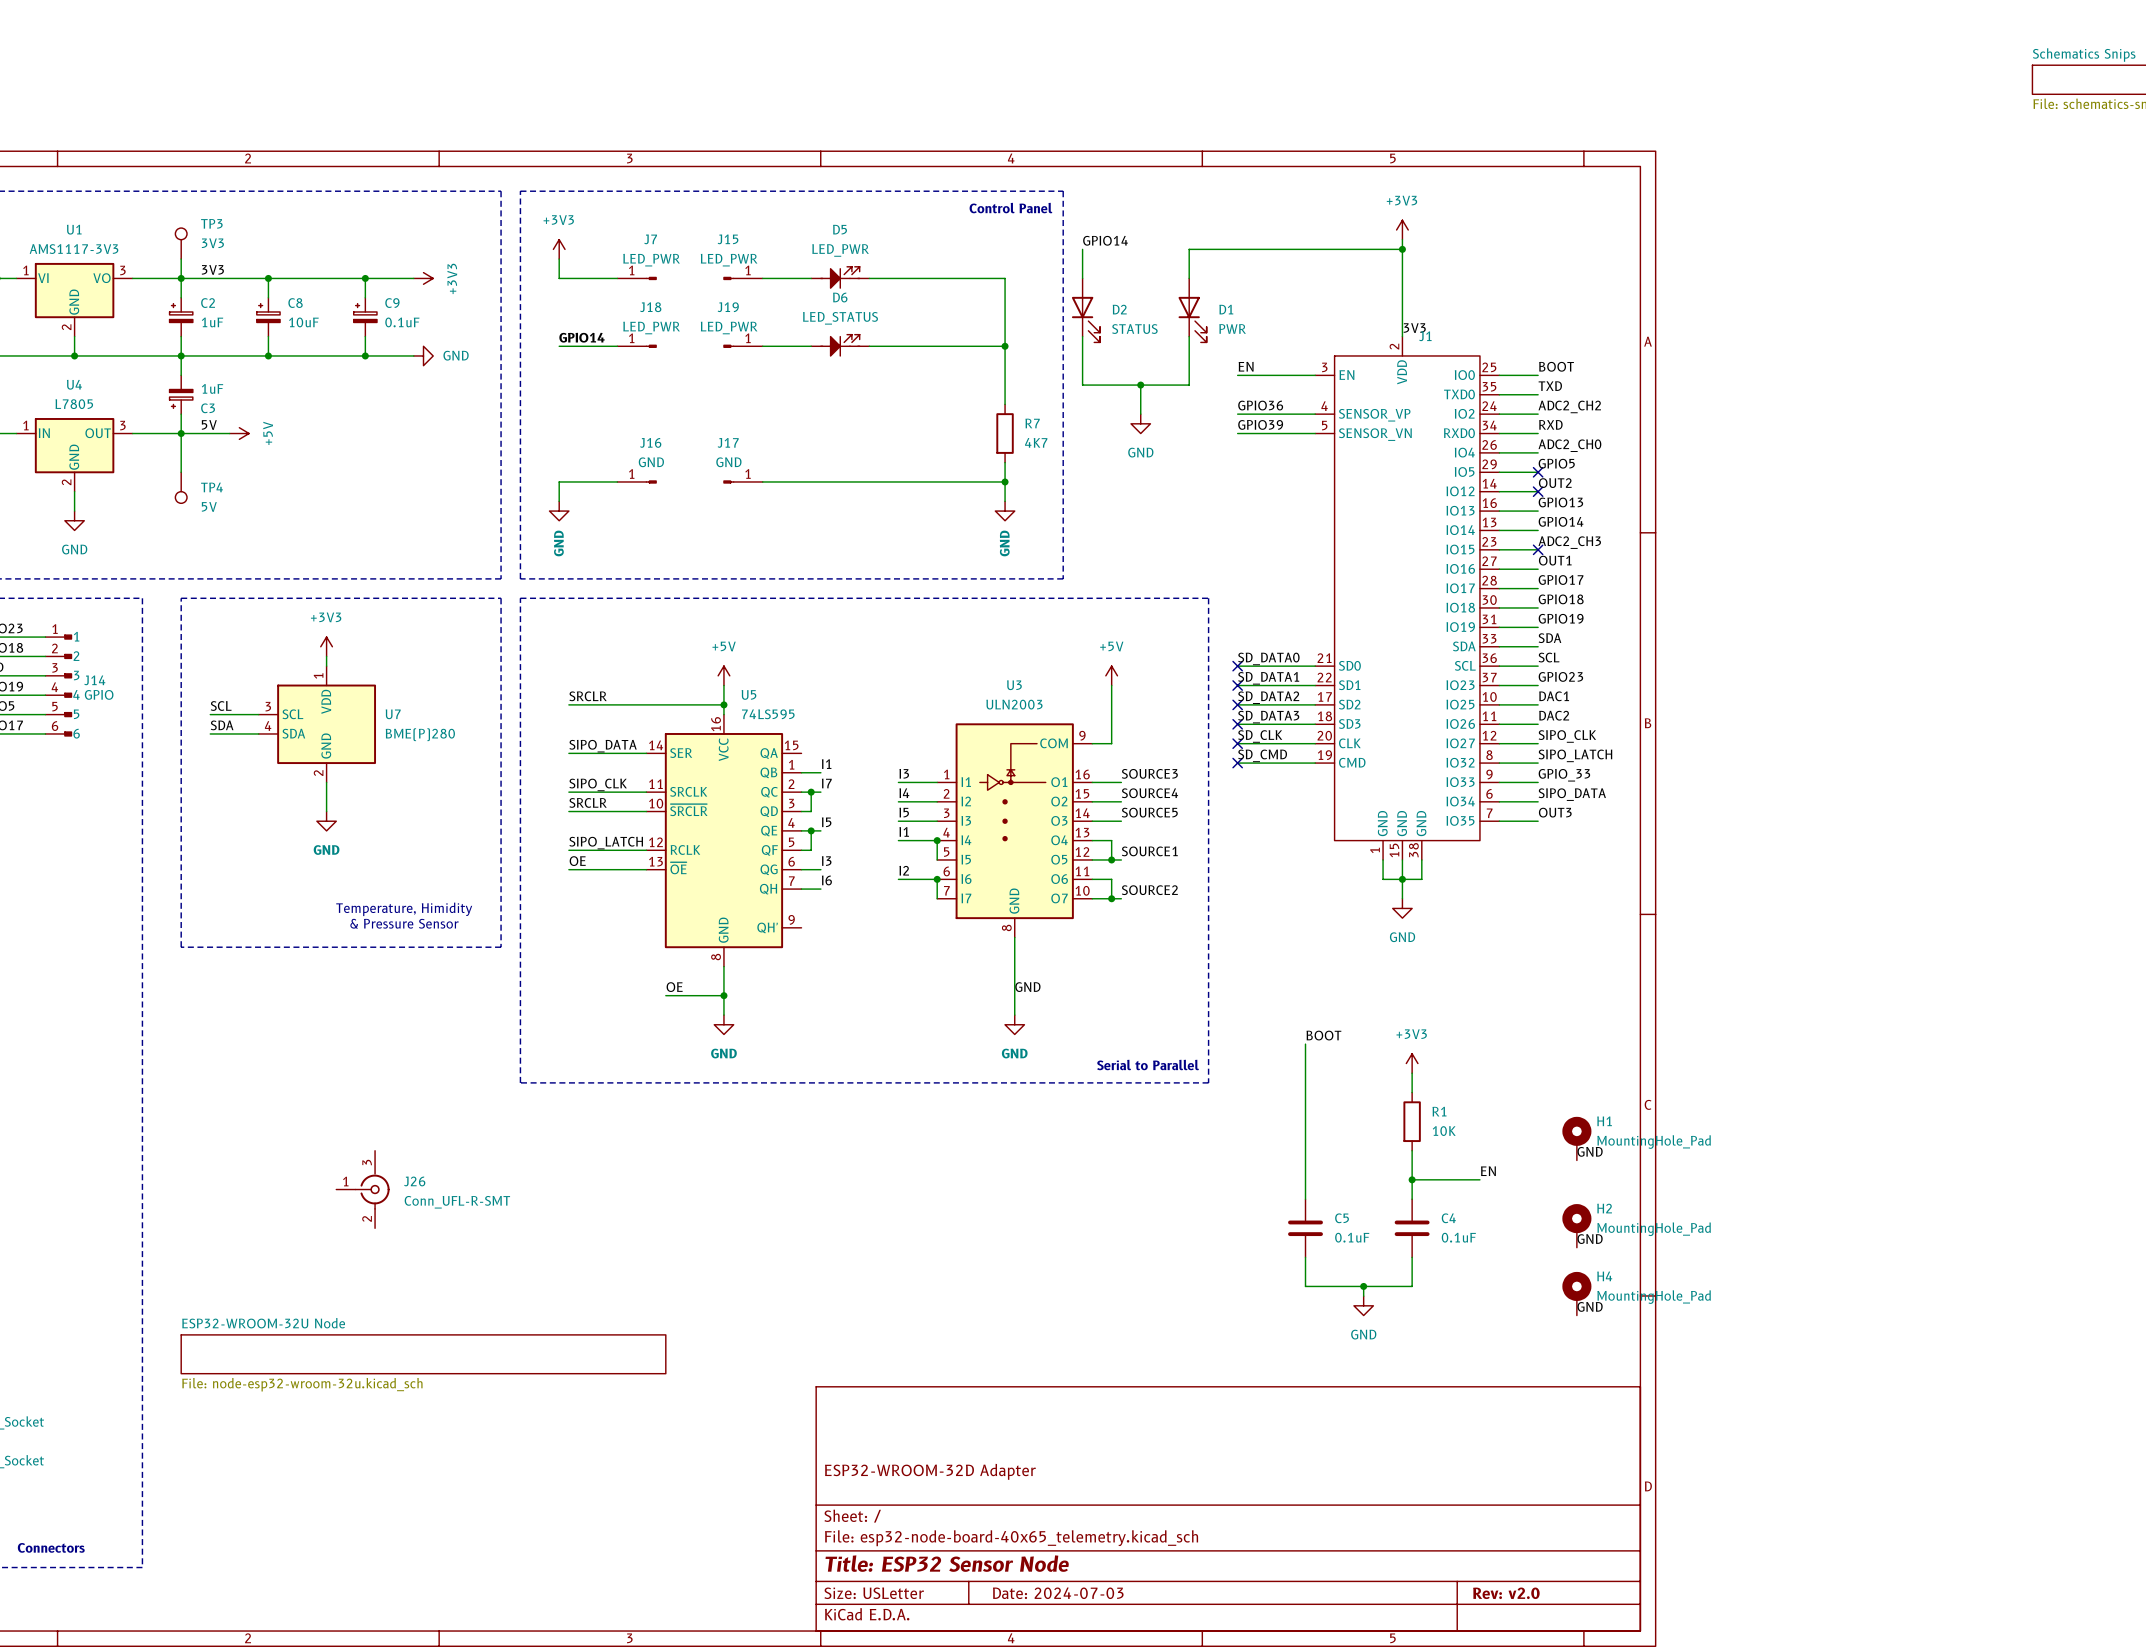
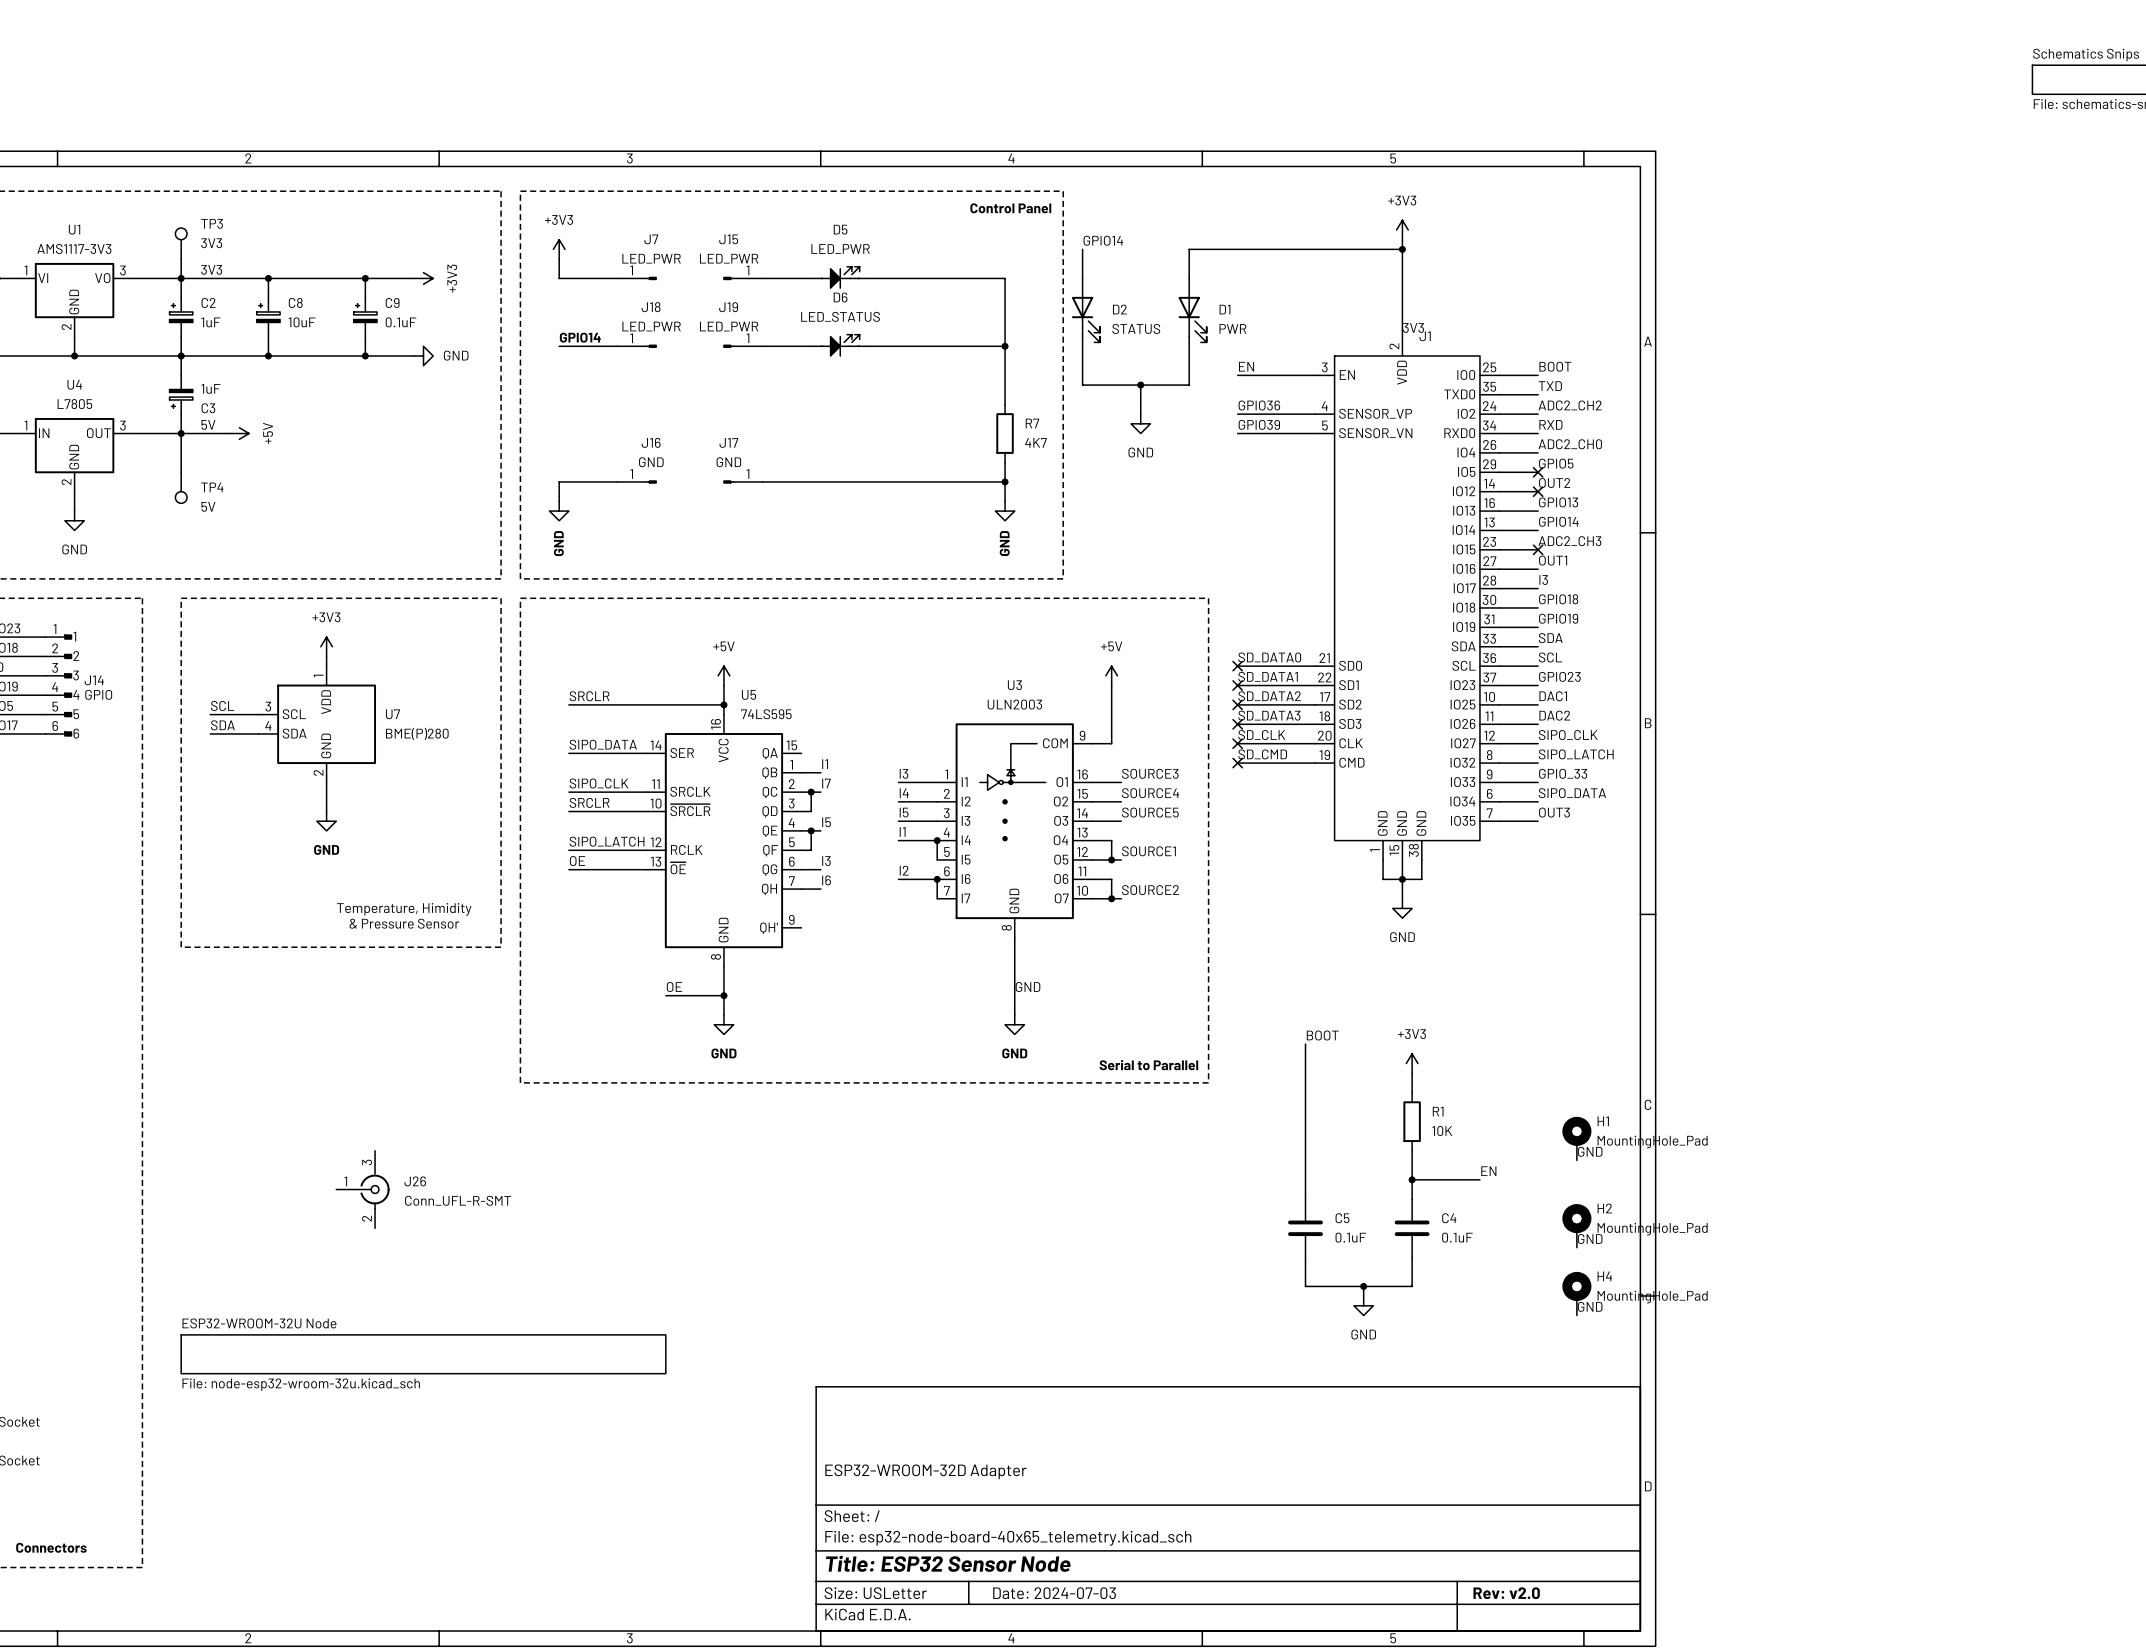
label: GPIO17 (1561, 580) -> I3 (1543, 580)

